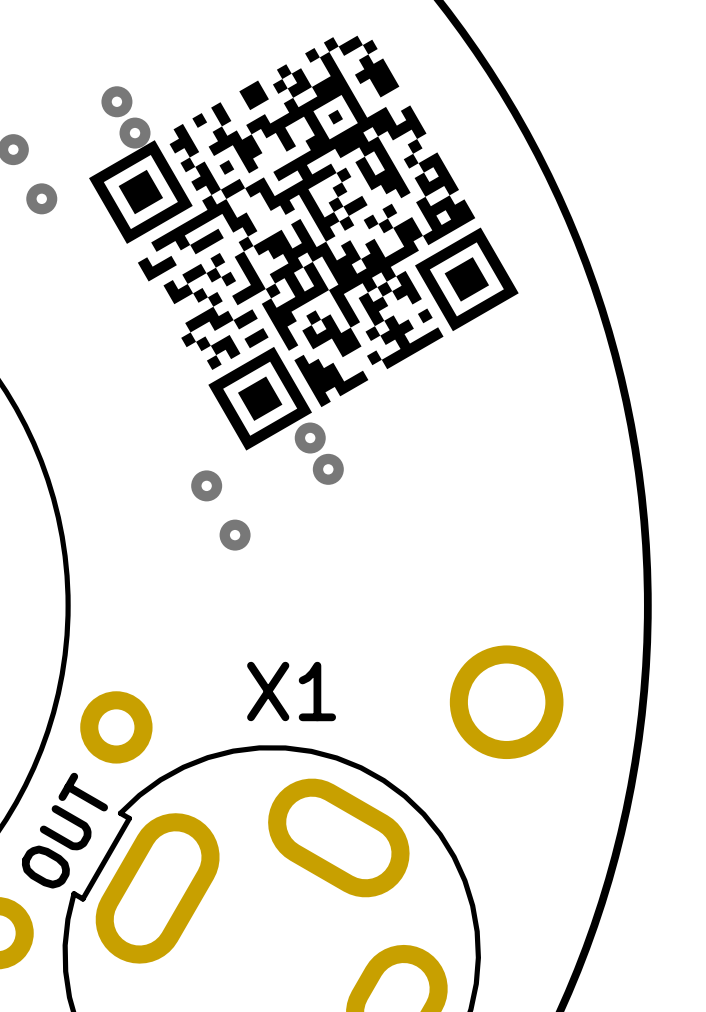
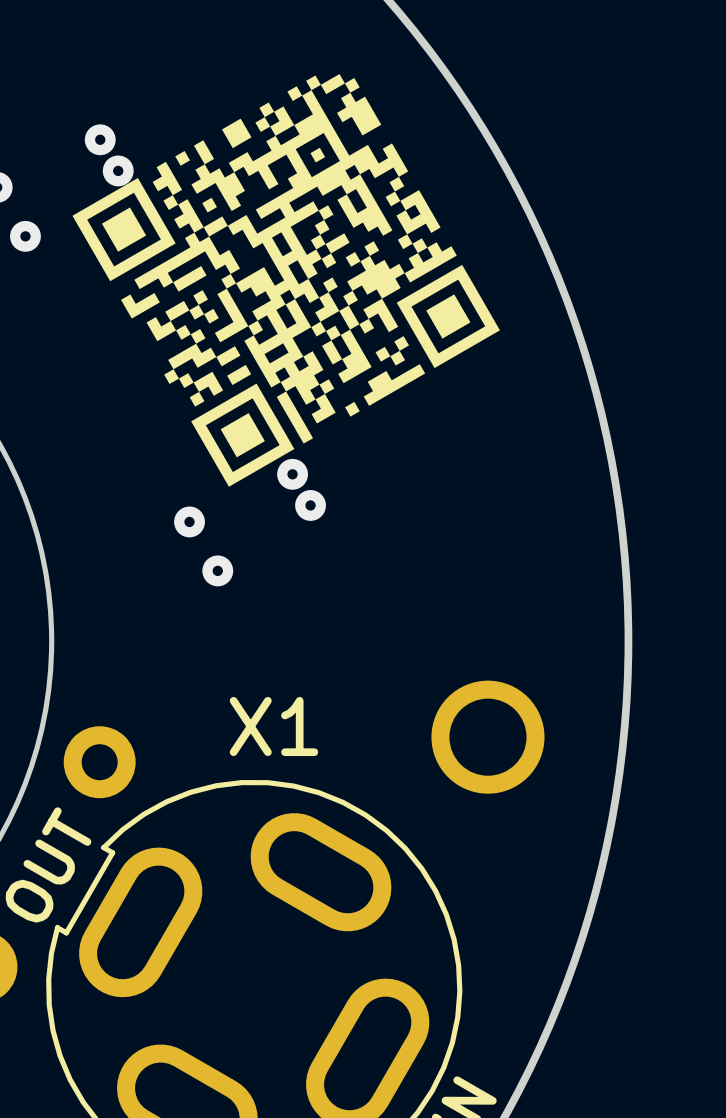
drawing shape: [89, 35, 519, 451] -> [72, 74, 500, 487]

